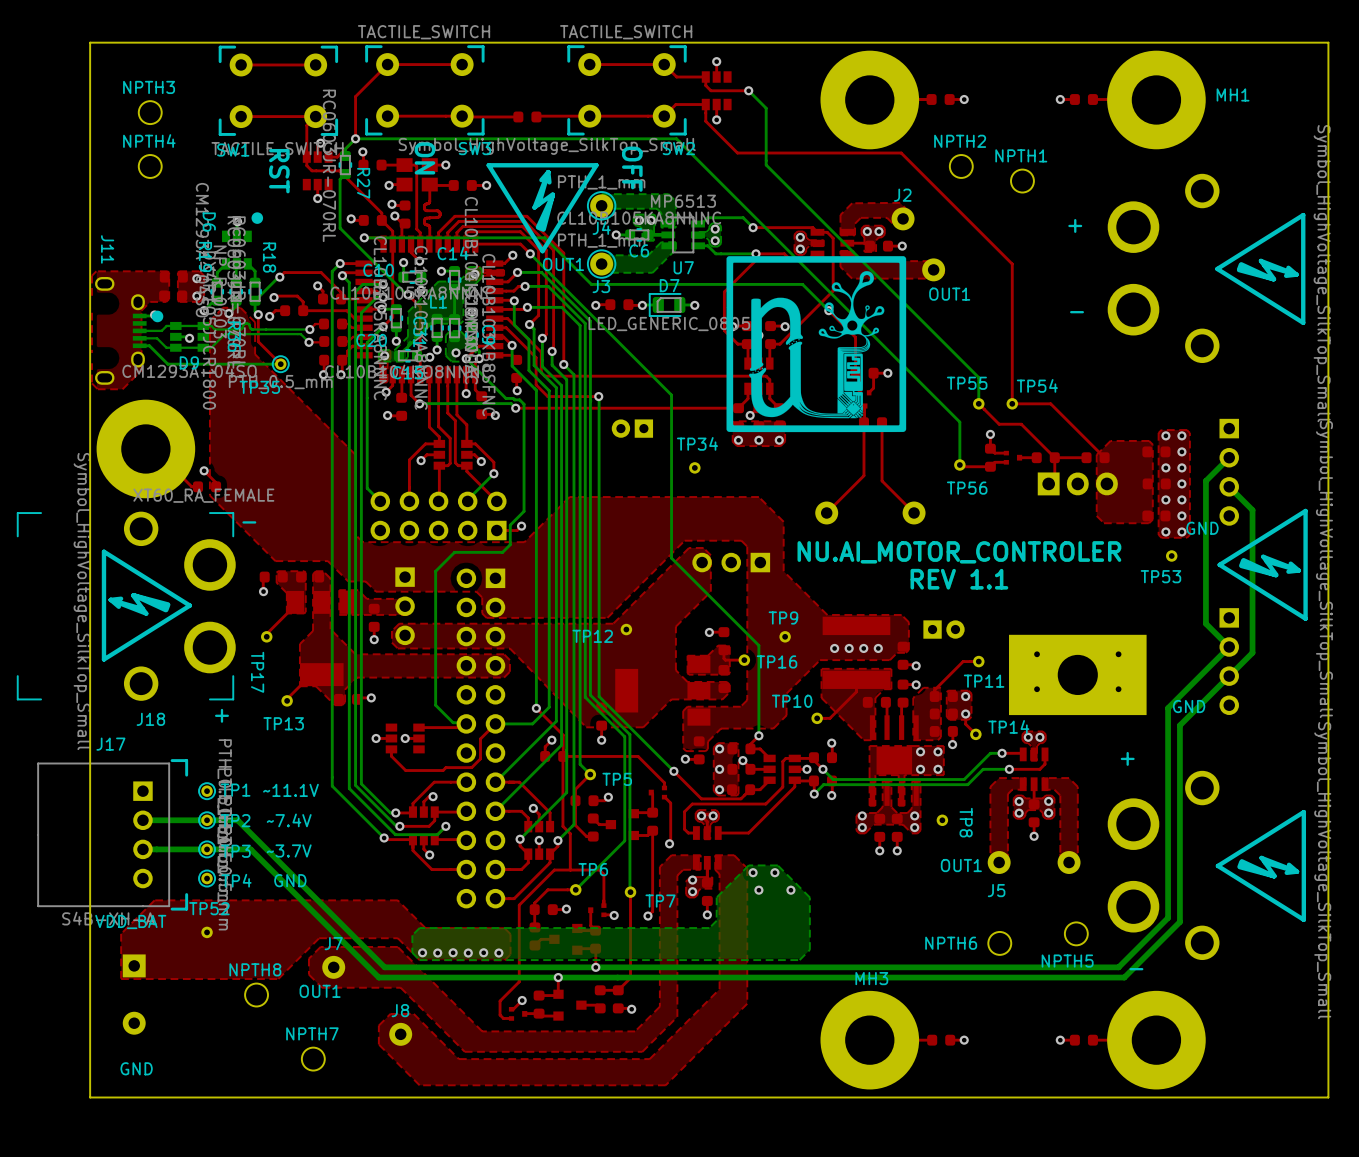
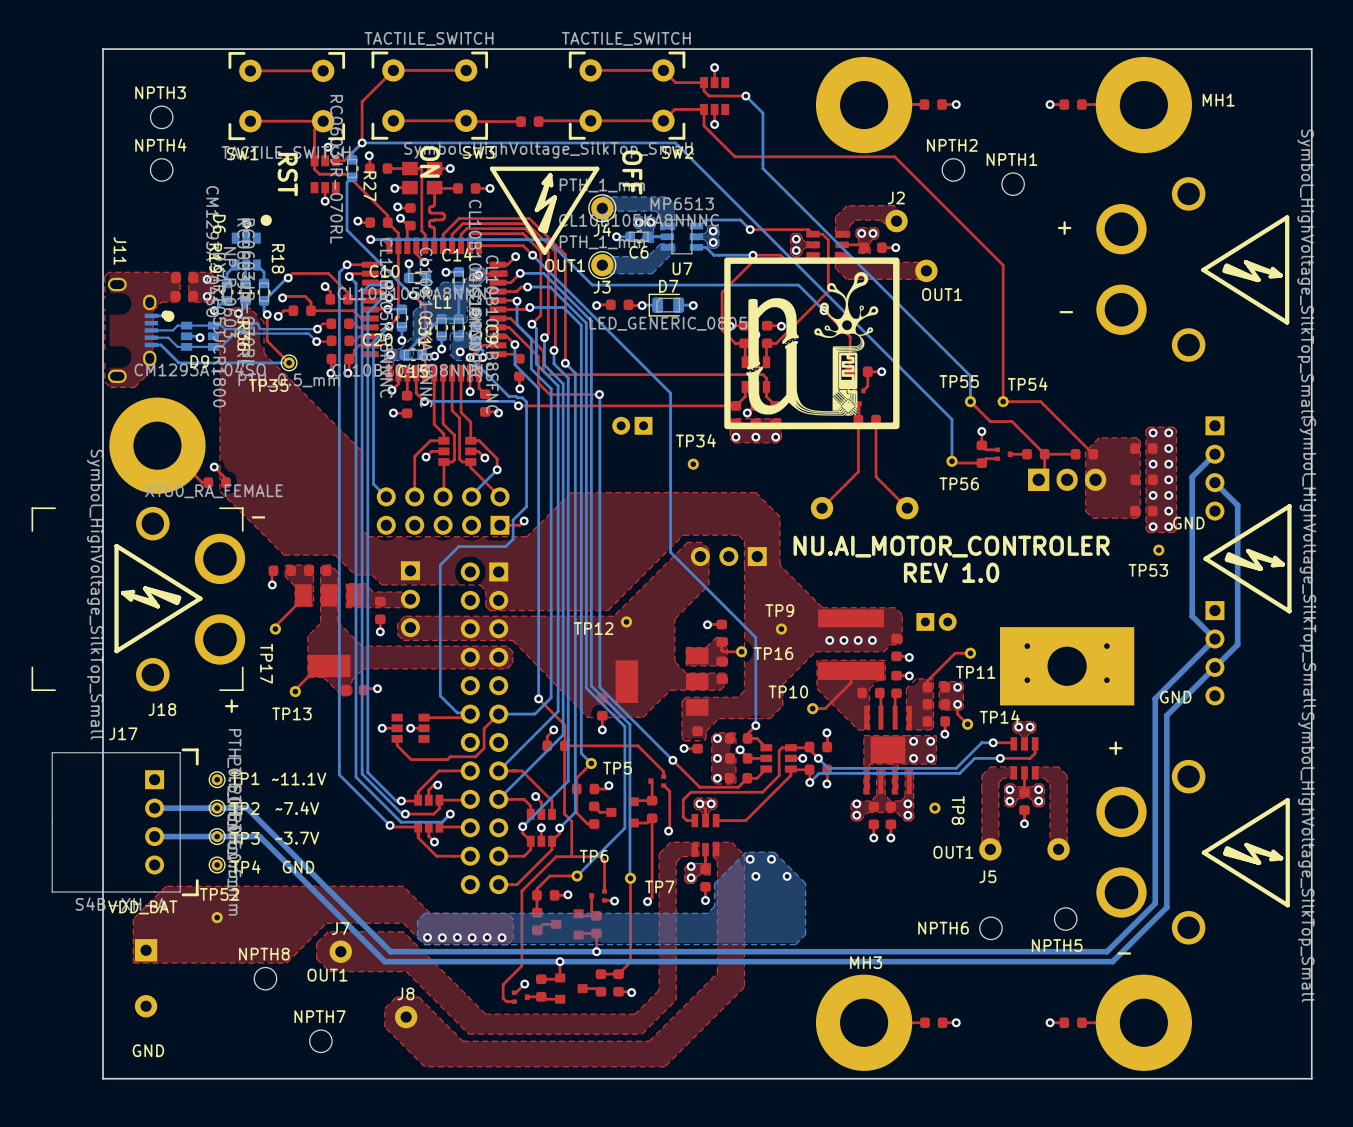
text: REV 1.1 (959, 579) -> none
text: none -> REV 1.0 (951, 572)

